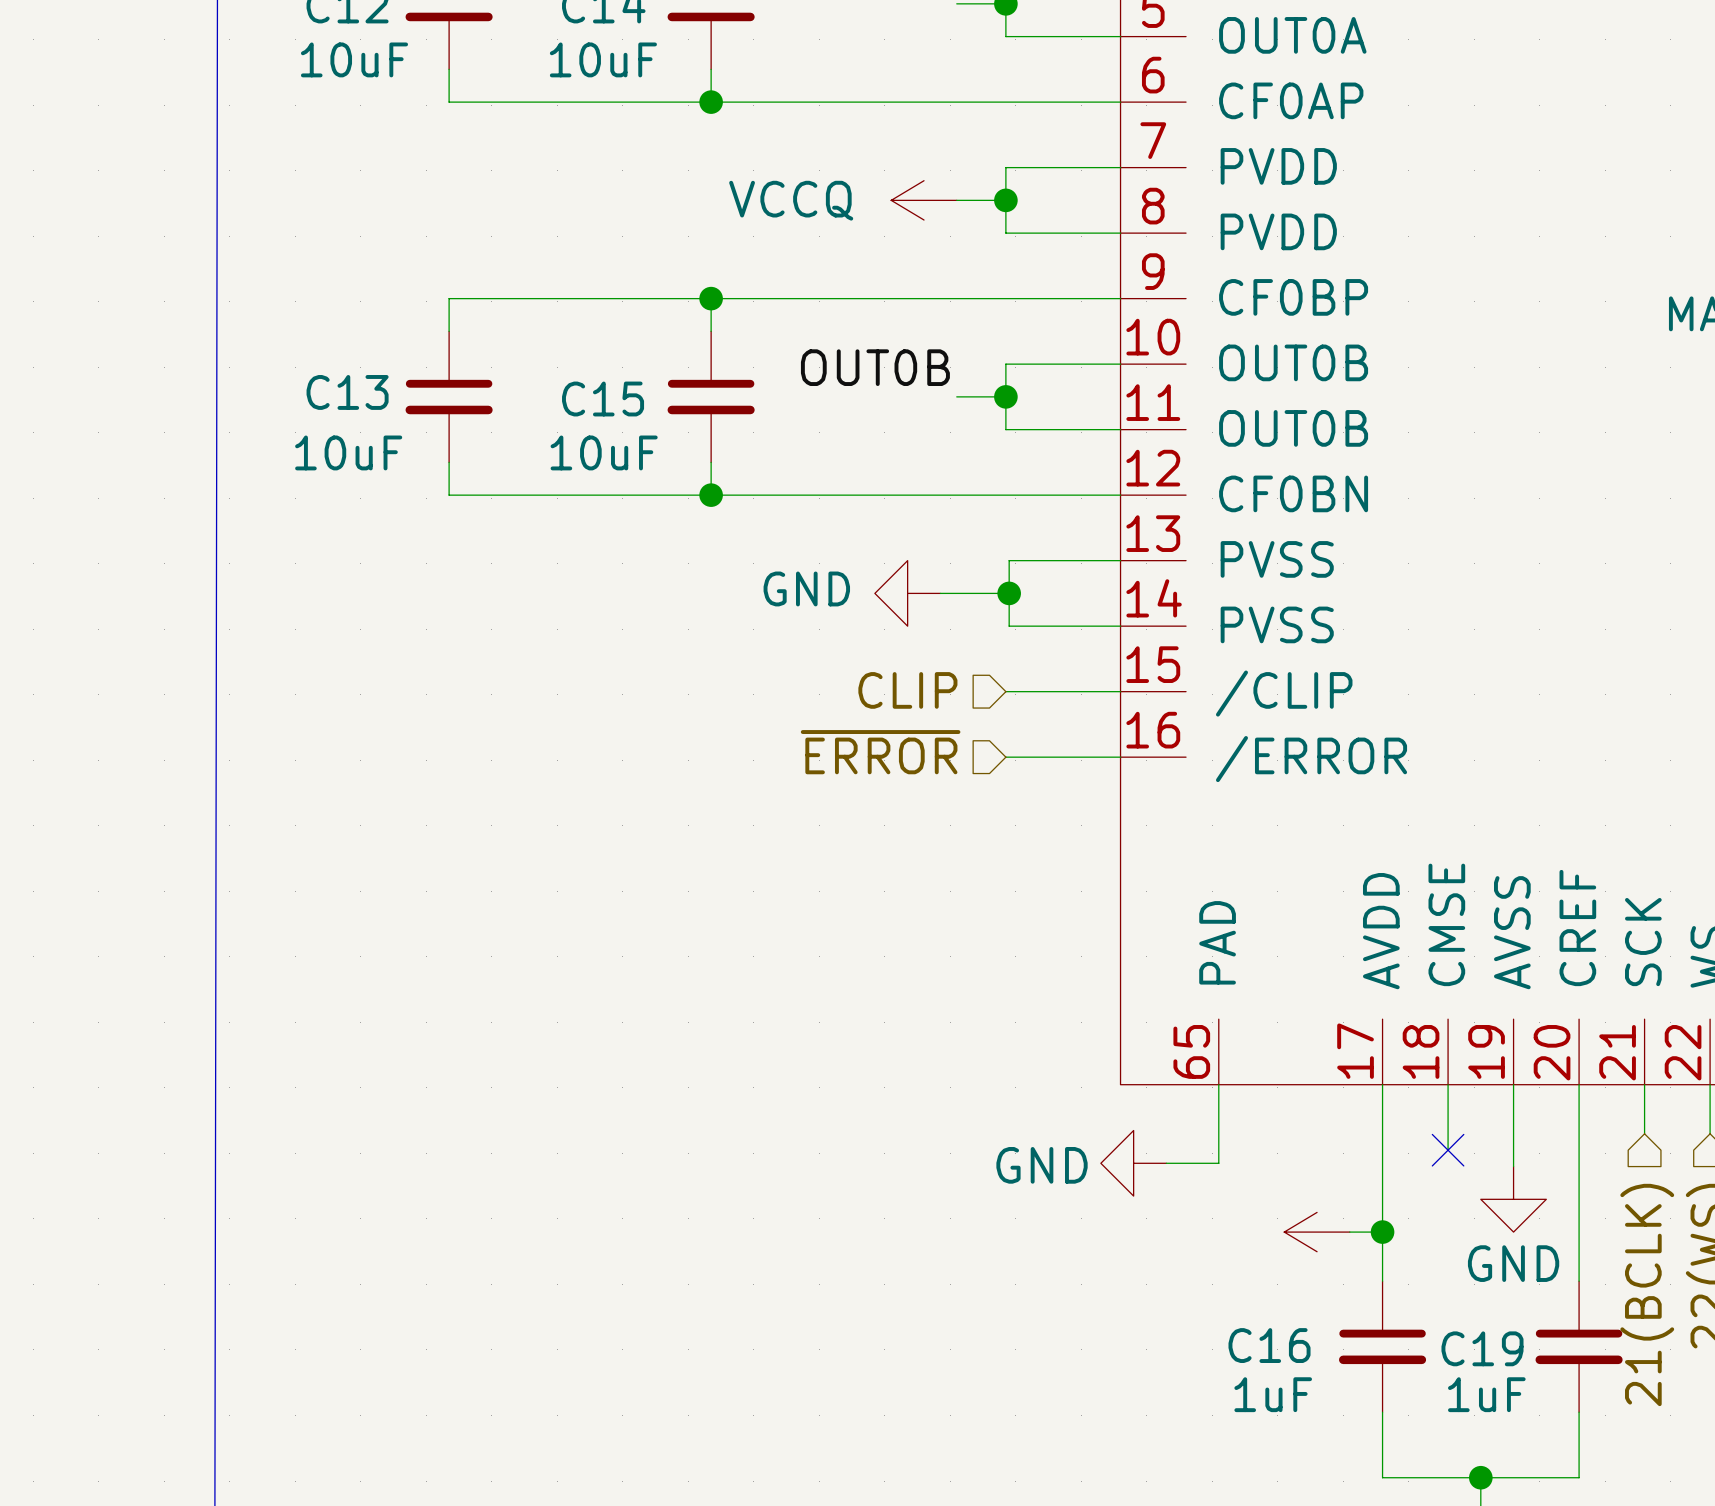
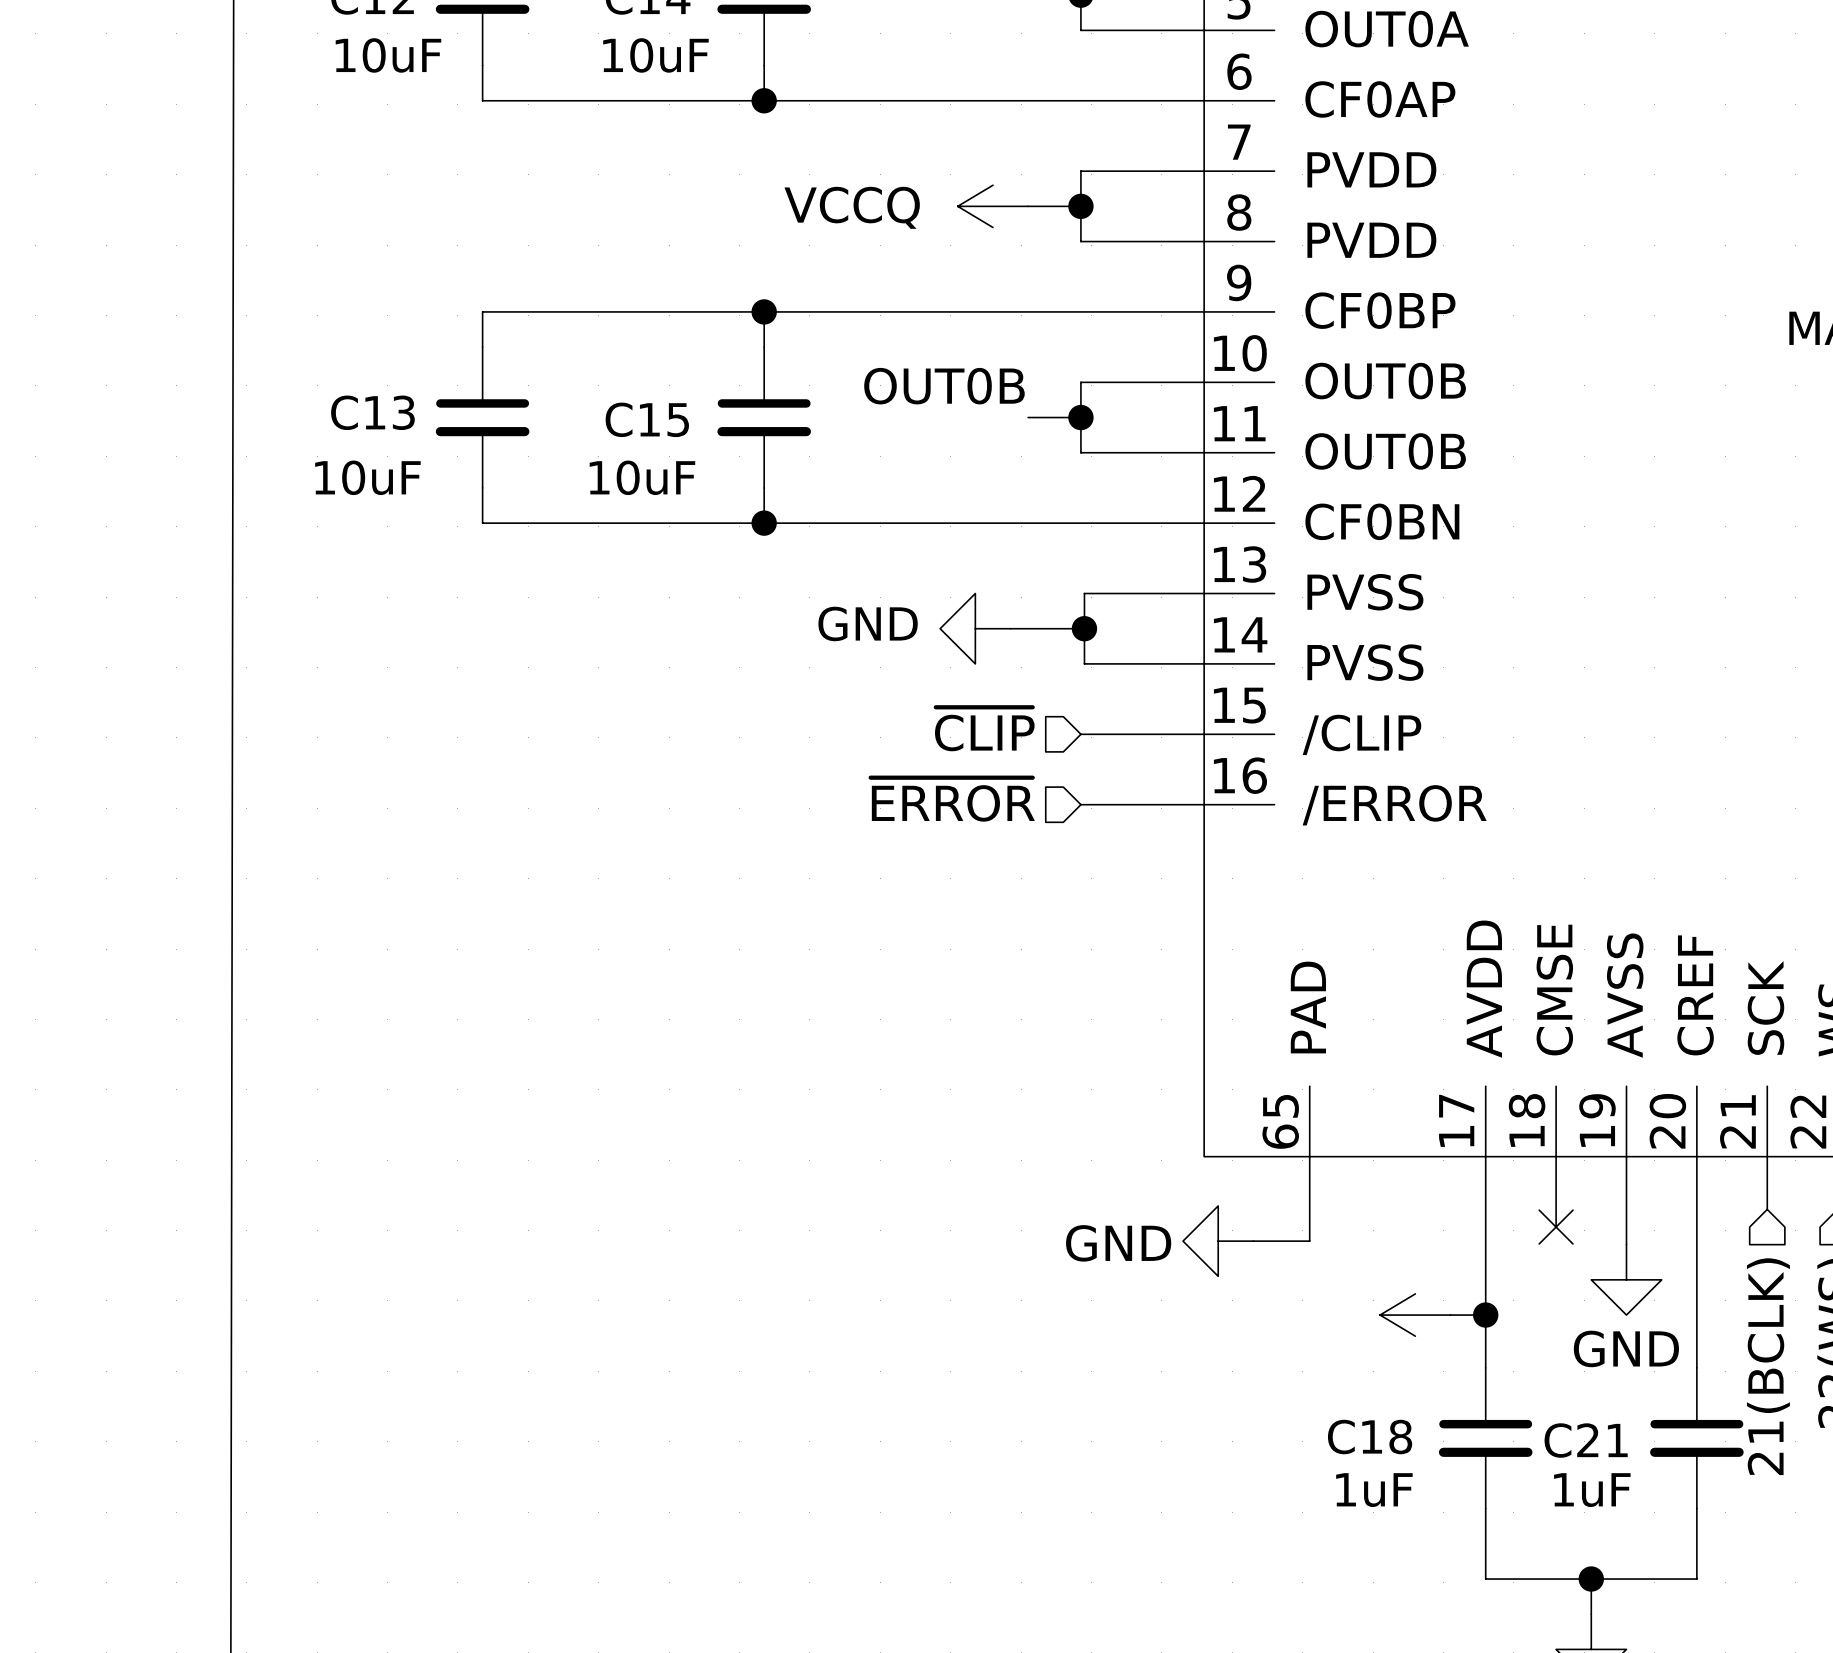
hierarchical label: CLIP (907, 690) -> ~{CLIP} (984, 729)
C16 name: C16 (1269, 1345) -> C18 (1370, 1437)
C19 name: C19 (1482, 1348) -> C21 (1586, 1440)

